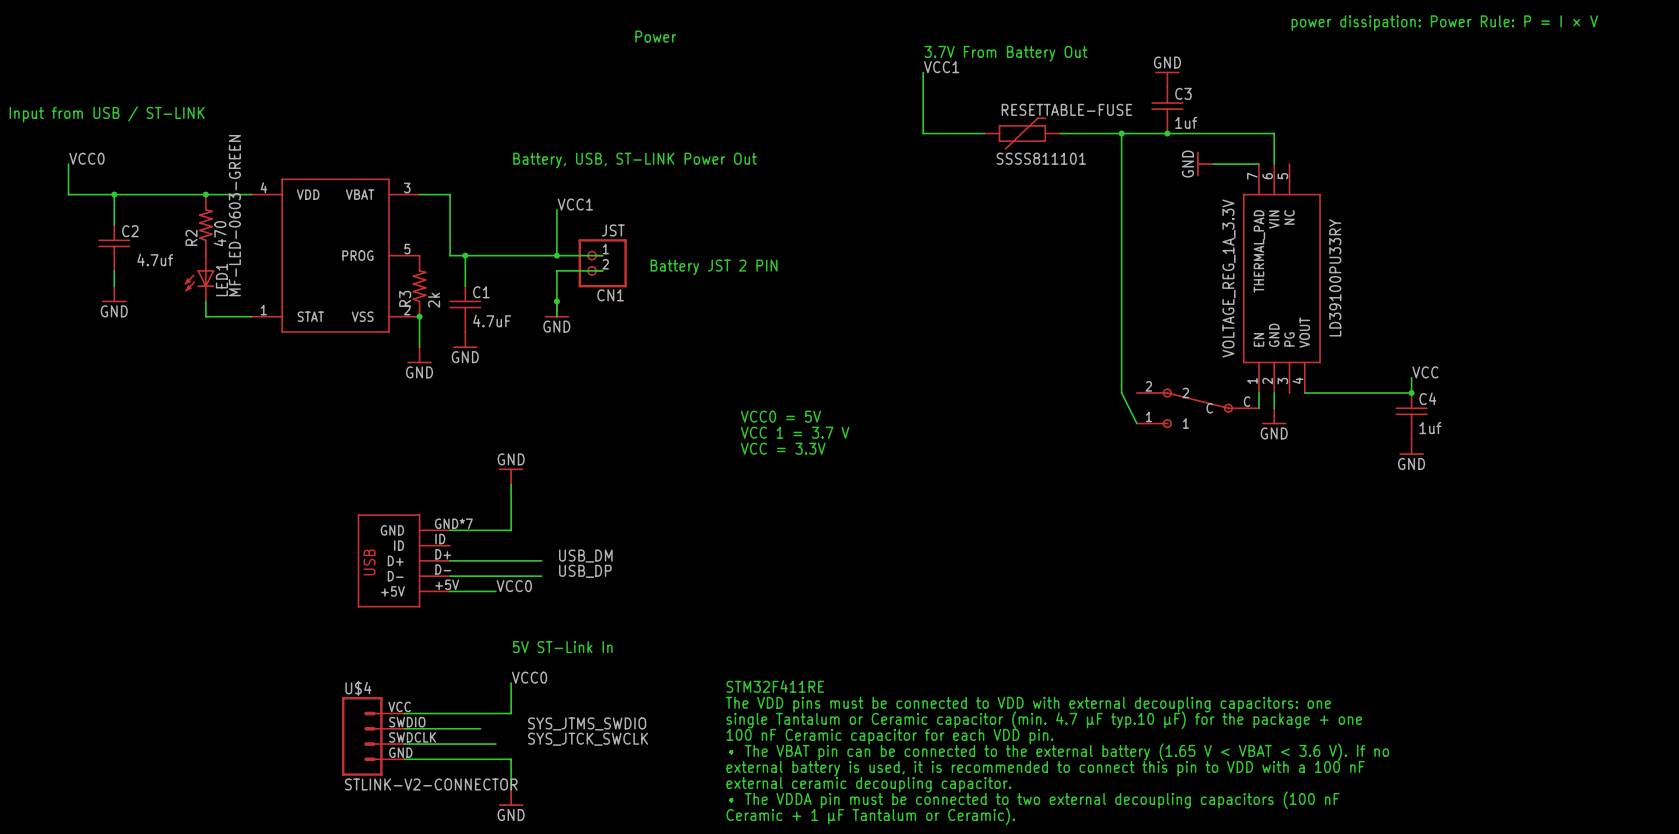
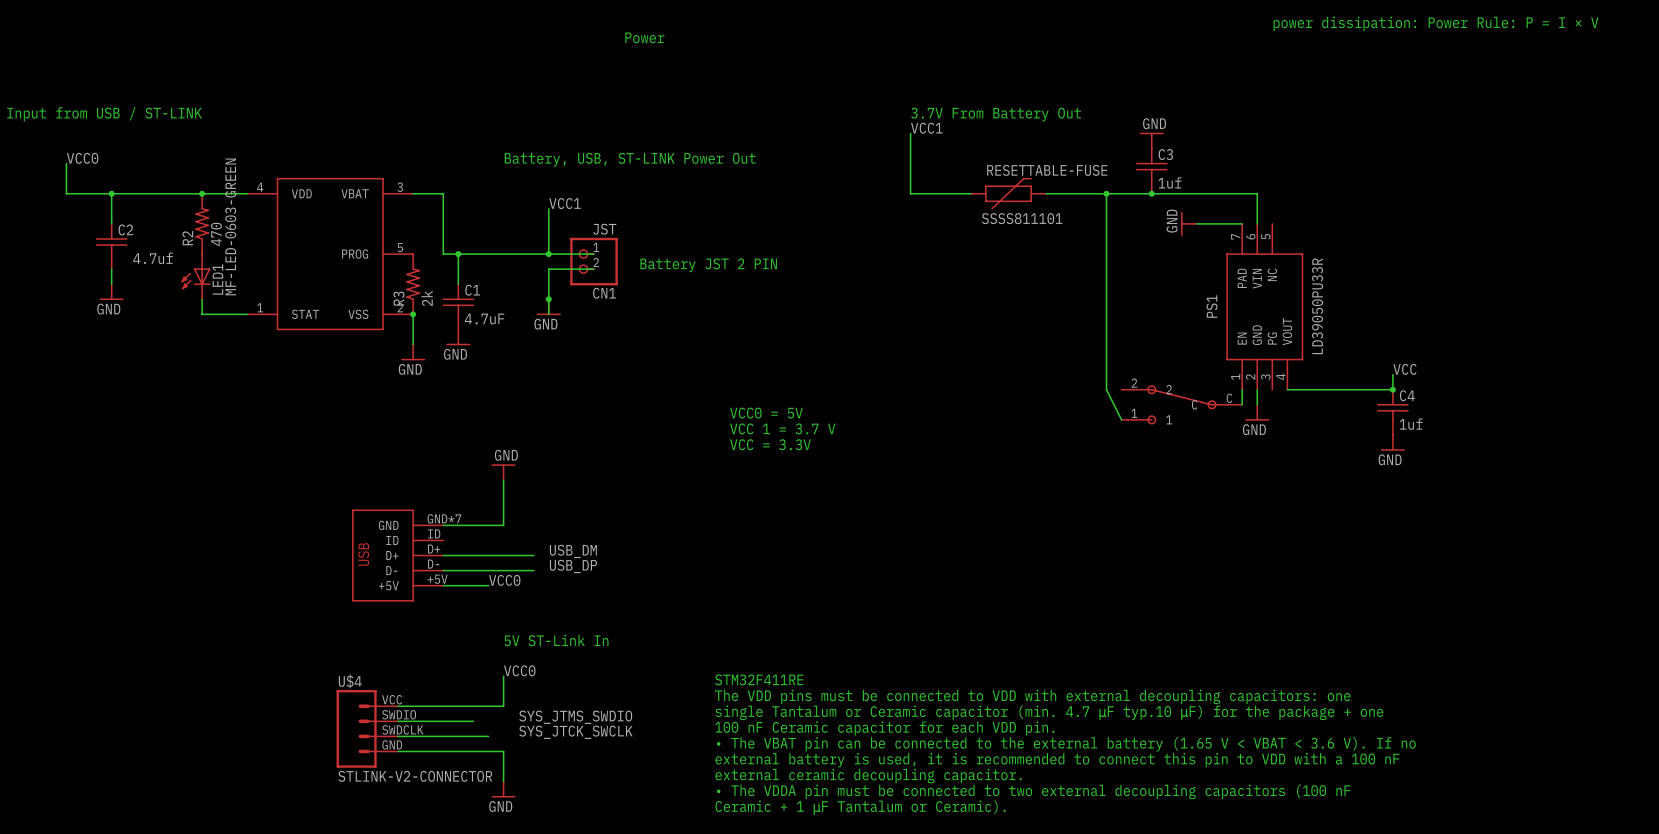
text position: 3.7V From Battery Out (1005, 53) -> 3.7V From Battery Out (996, 114)
label position: VCC1 (941, 67) -> VCC1 (926, 128)
wire: (923, 72) (923, 133) (984, 133) -> (910, 133) (910, 193) (970, 193)
power symbol: GND (1167, 79) -> none
C3 position: (1167, 110) -> (1151, 171)
RESETTABLE-FUSE position: (1022, 133) -> (1008, 193)
wire: (1060, 133) (1274, 133) (1274, 164) -> (1046, 193) (1257, 193) (1257, 223)
wire: (1121, 133) (1121, 194) -> none
junction: (1121, 133) -> none
junction: (1167, 133) -> none
power symbol: none -> GND (1151, 140)
power symbol: GND (1205, 164) -> none
wire: (1213, 164) (1258, 164) -> (1196, 223) (1242, 223)
junction: none -> (1106, 193)
junction: none -> (1151, 193)
power symbol: none -> GND (1189, 223)
VOLTAGE_REG_1A_3.3V: LD39100PU33RY (1281, 278) -> none
PS1: none -> LD39050PU33R (1264, 306)

